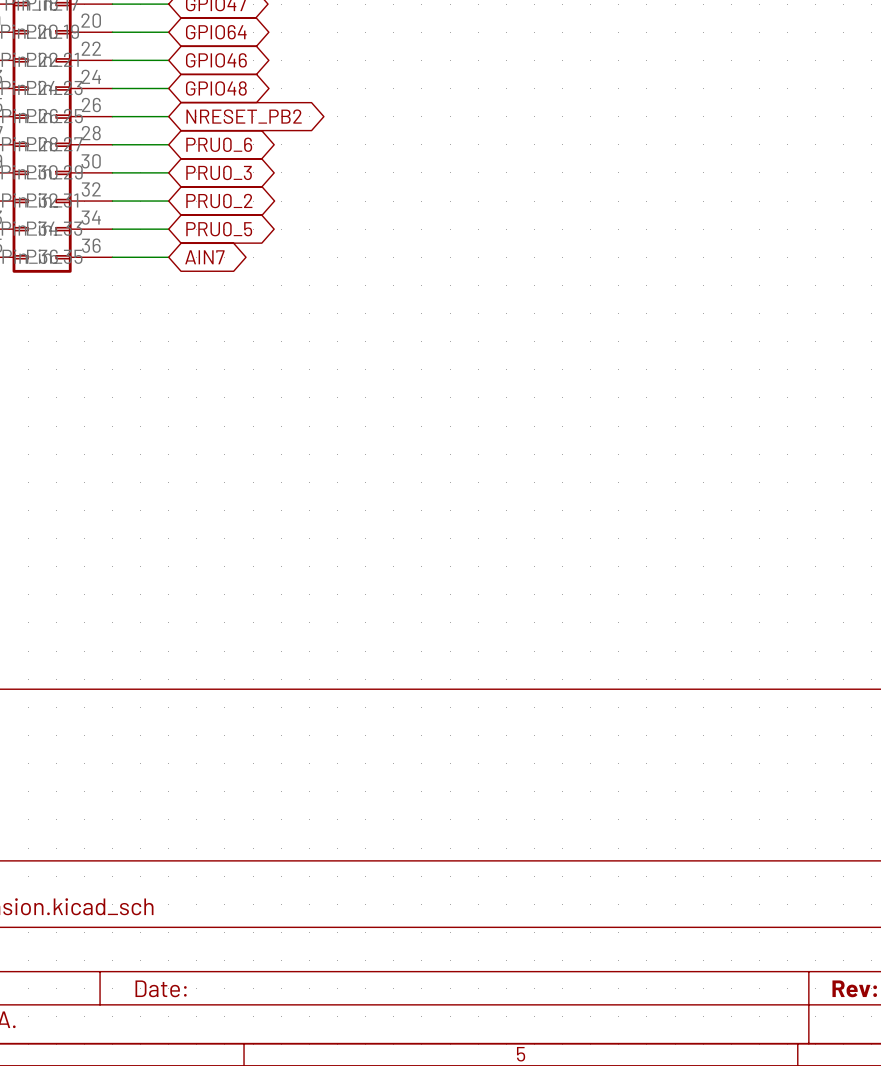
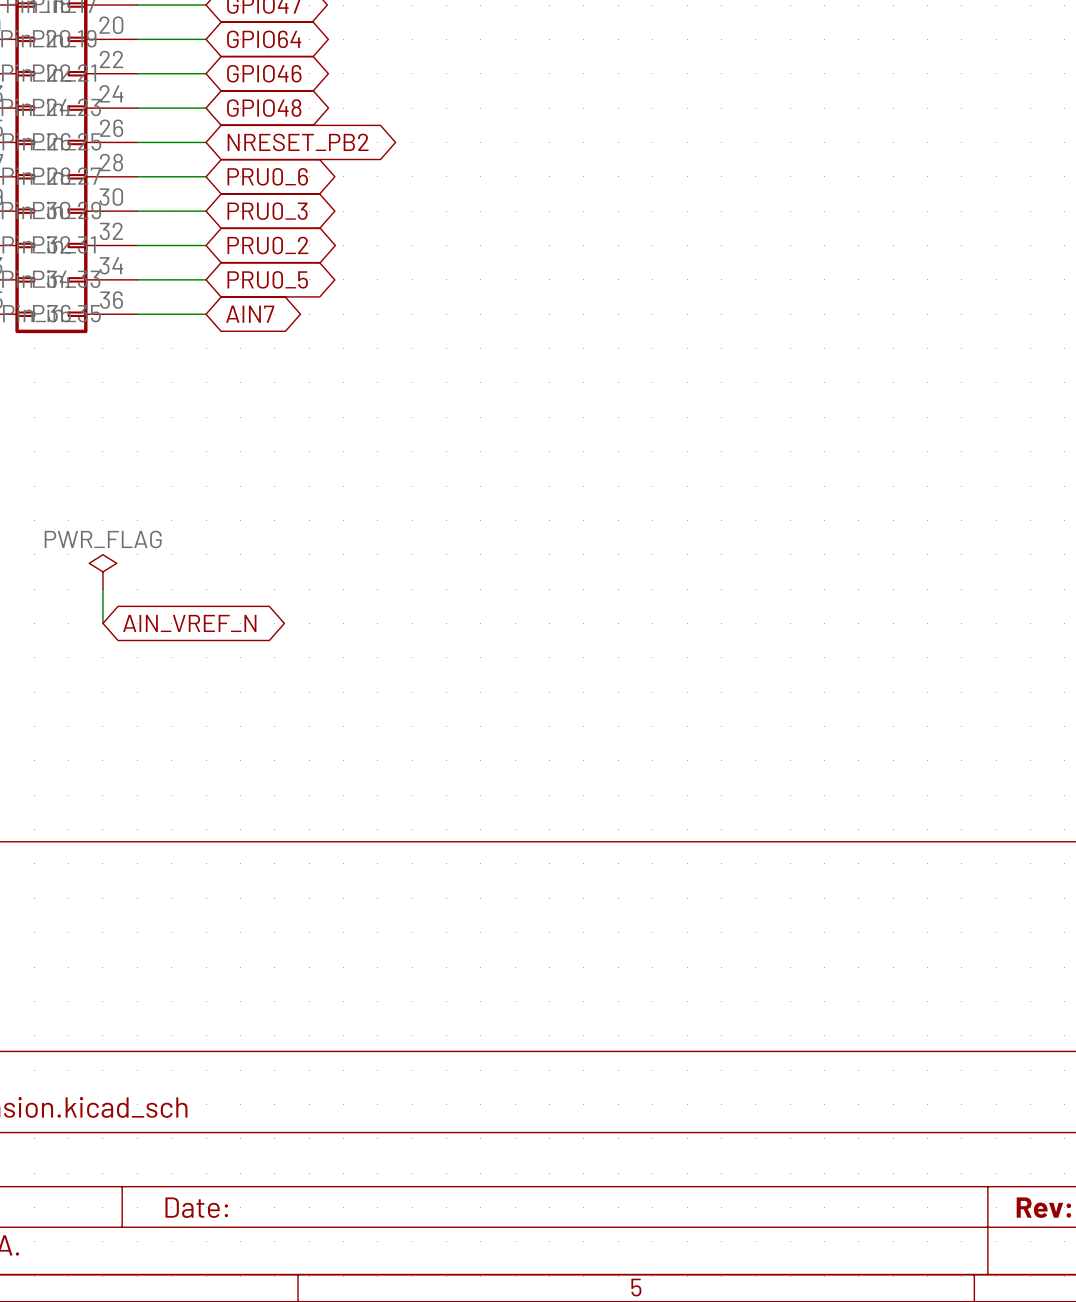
power symbol: none -> PWR_FLAG (102, 571)
wire: none -> (102, 589) (102, 623)
global label: none -> AIN_VREF_N (189, 623)

